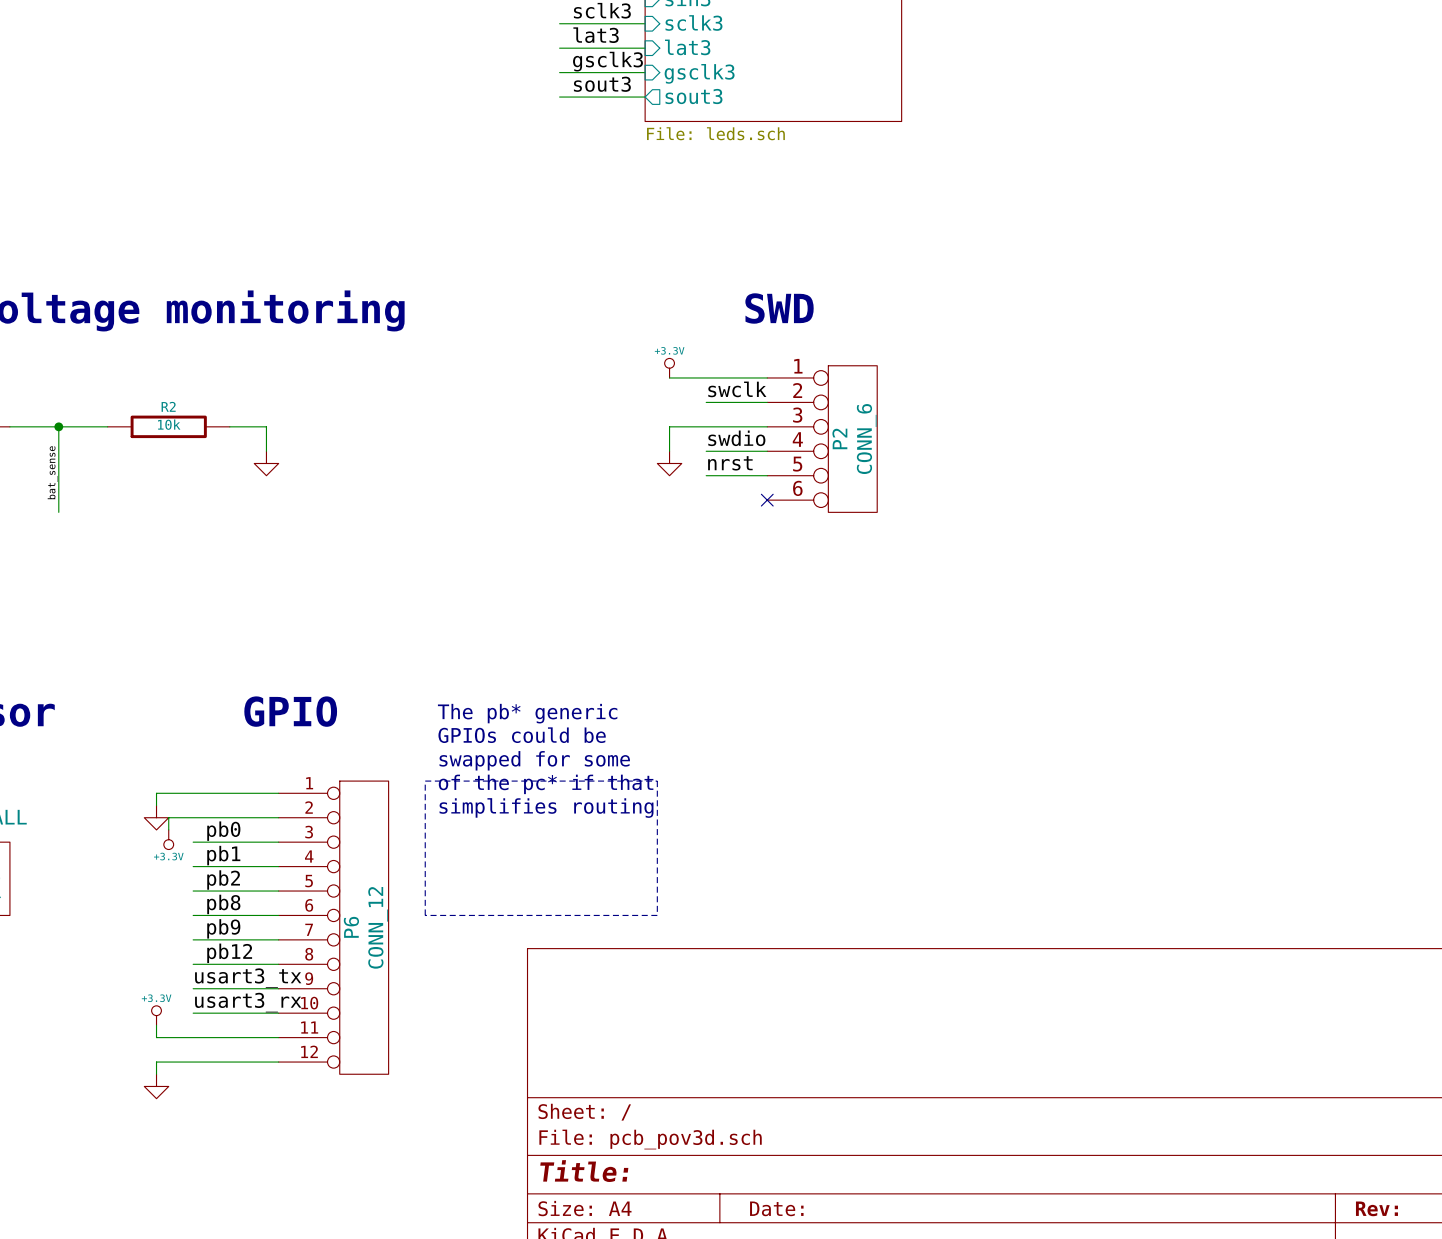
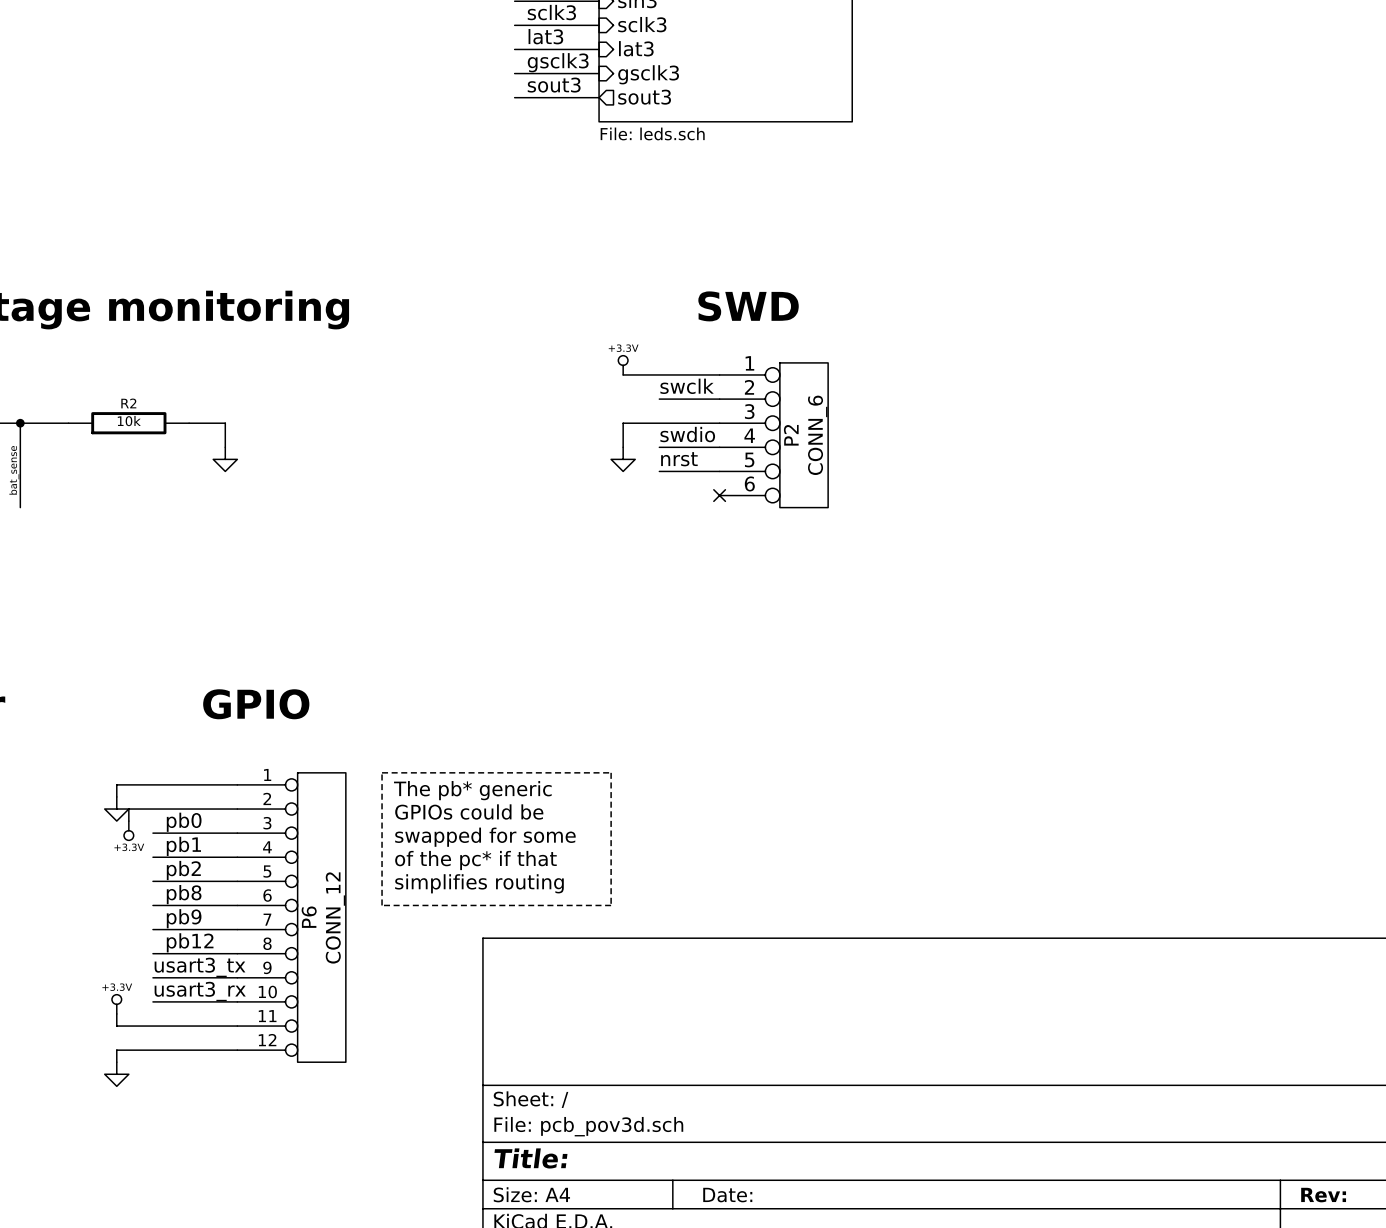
text position: The pb* generic (527, 713) -> The pb* generic (472, 790)
text position: GPIOs could be (522, 735) -> GPIOs could be (469, 811)
text position: swapped for some (534, 760) -> swapped for some (485, 837)
text position: of the pc* if that (546, 784) -> of the pc* if that (475, 860)
text position: simplifies routing (546, 808) -> simplifies routing (479, 883)

